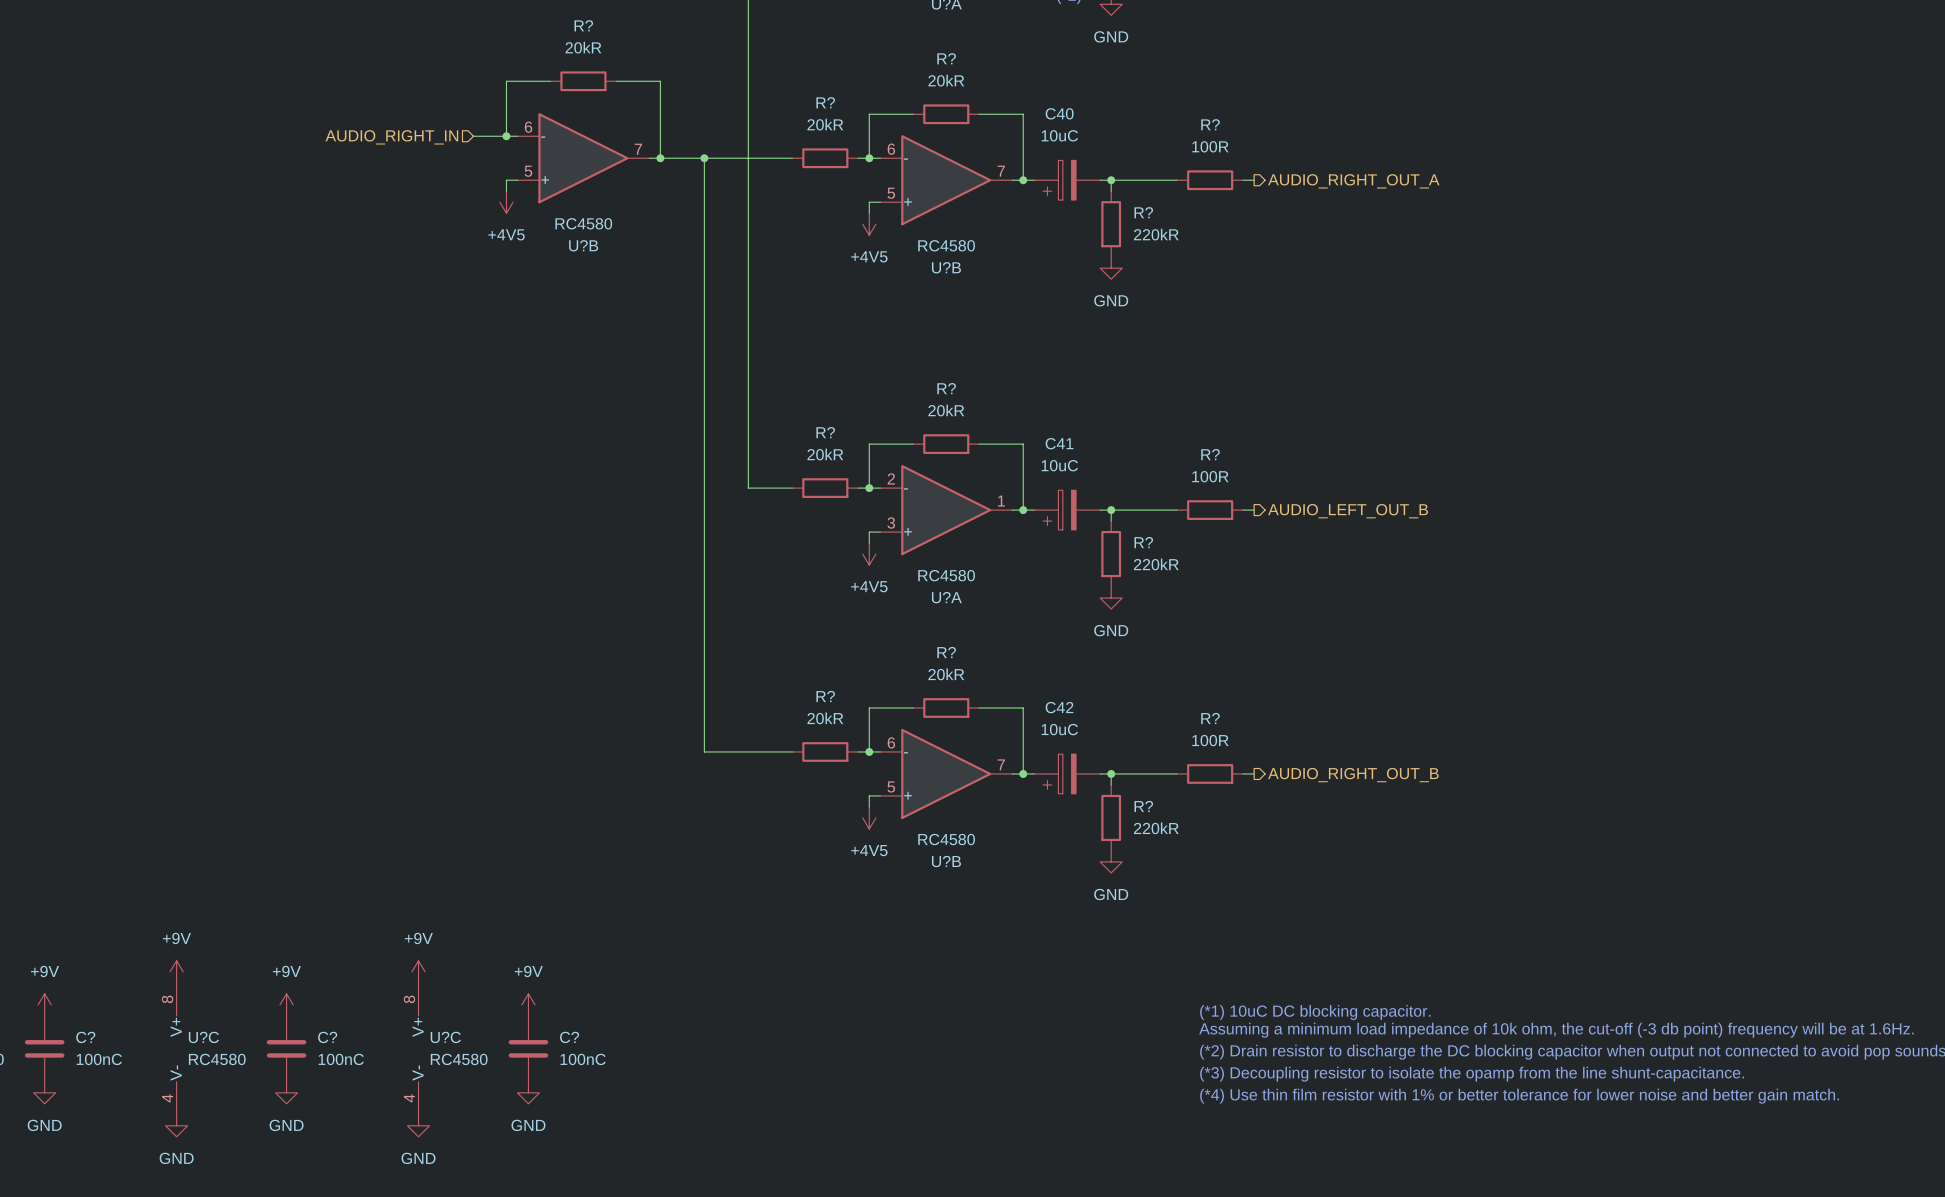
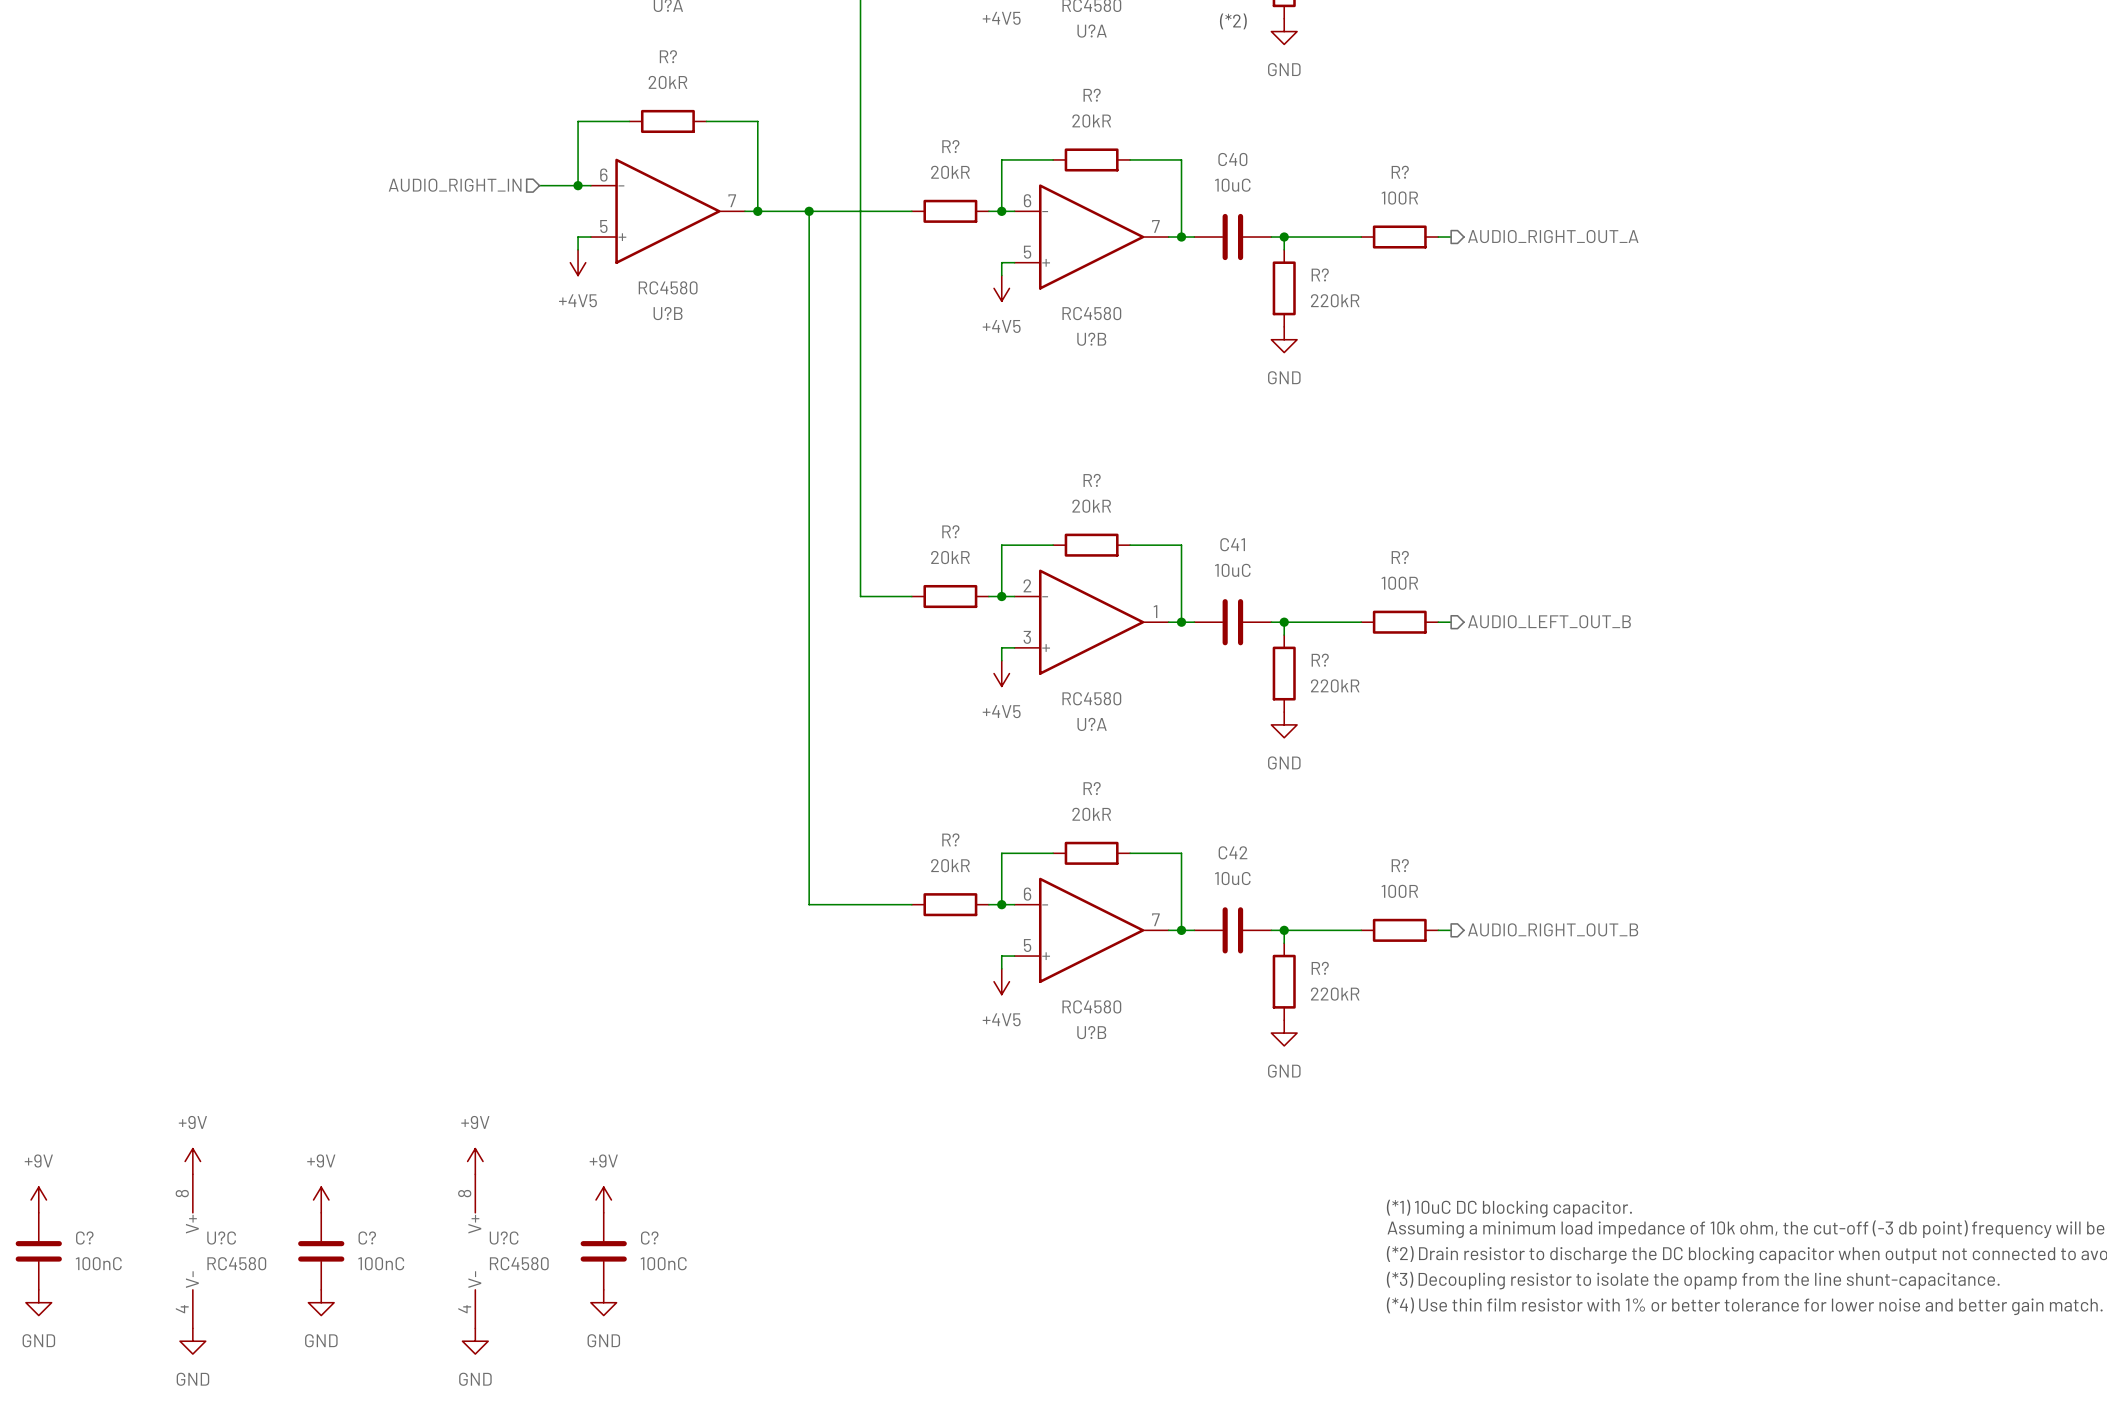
C40 symbol: [1034, 160, 1101, 201] -> [1194, 213, 1272, 261]
C41 symbol: [1034, 490, 1101, 530] -> [1194, 599, 1272, 646]
C42 symbol: [1034, 754, 1101, 794] -> [1194, 907, 1272, 954]

